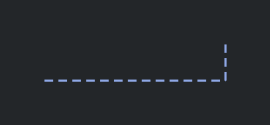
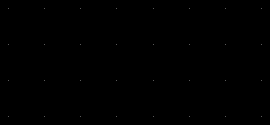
line: (225, 44) (225, 80) (44, 80) -> none

